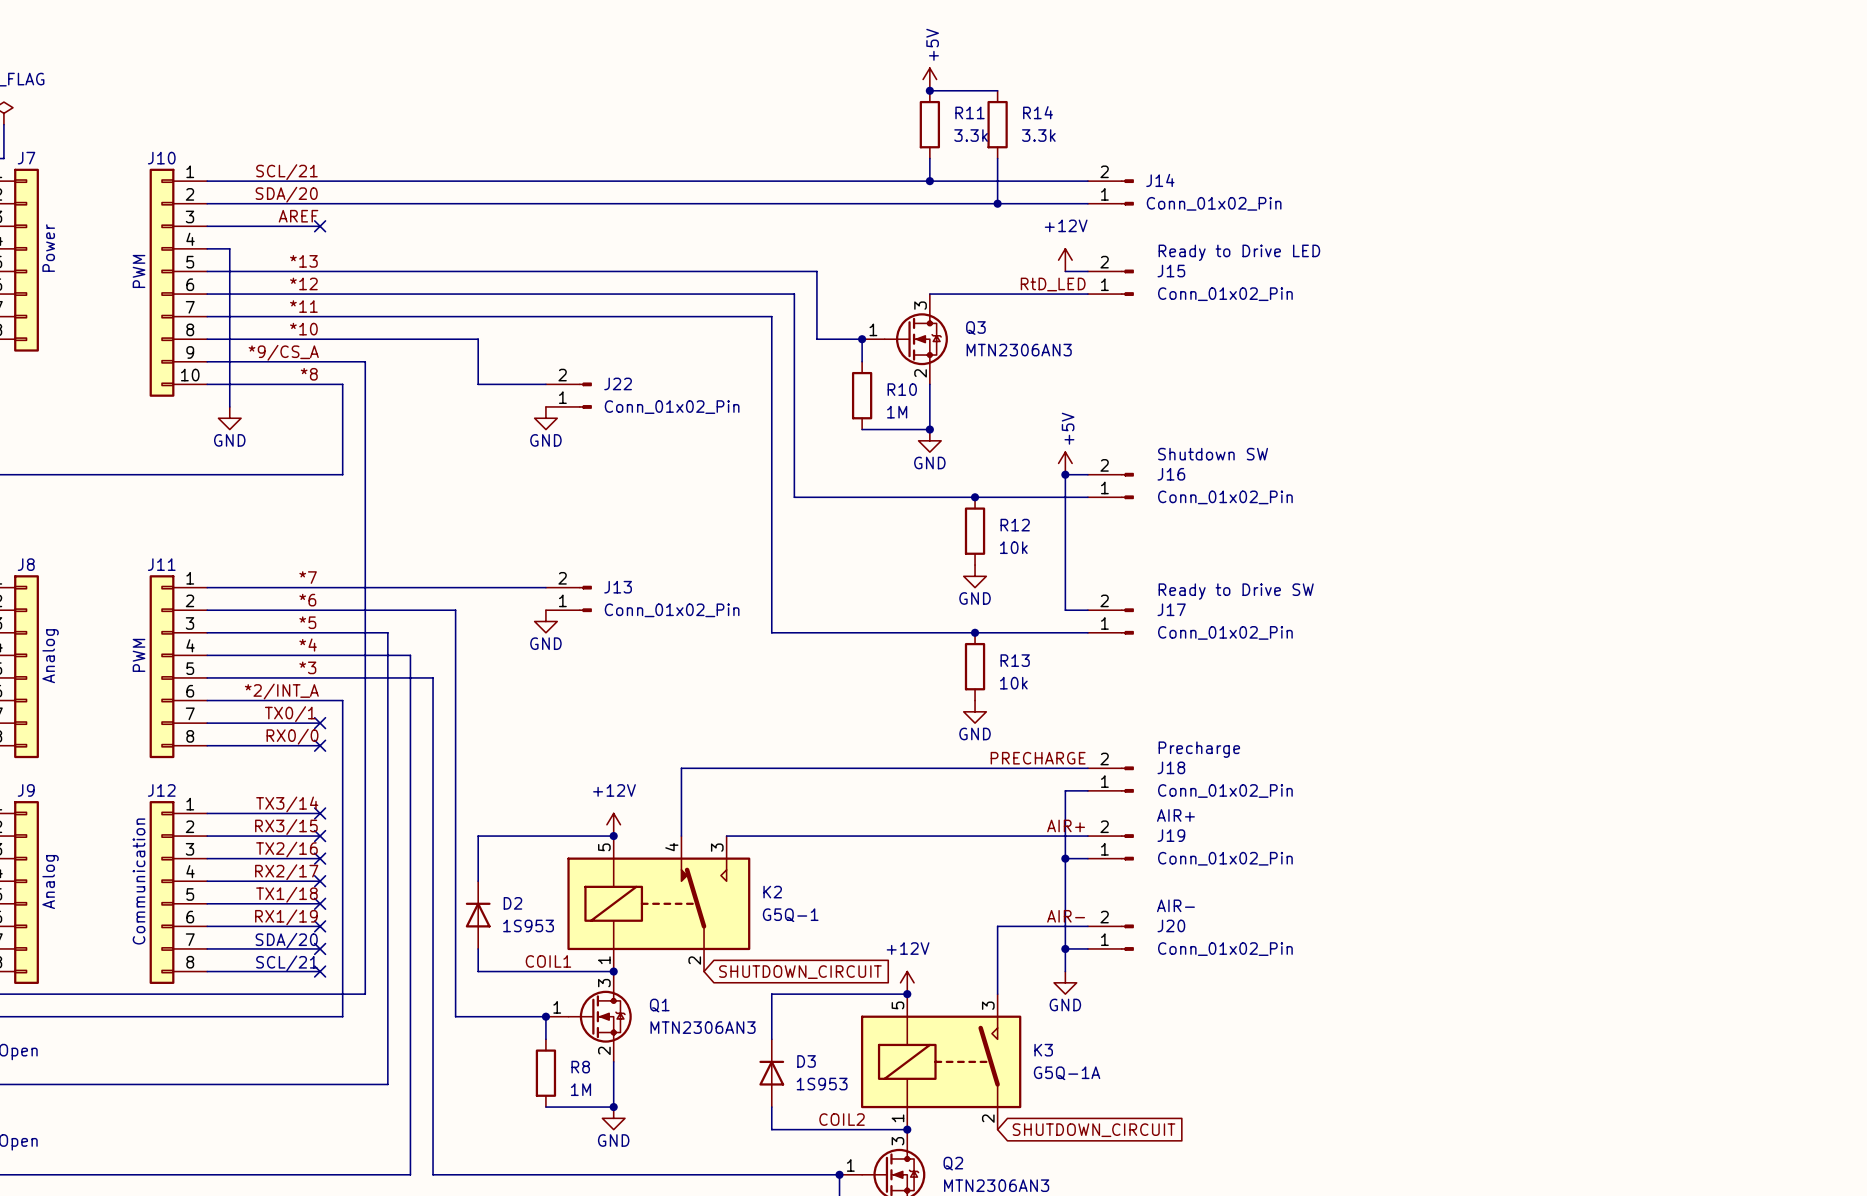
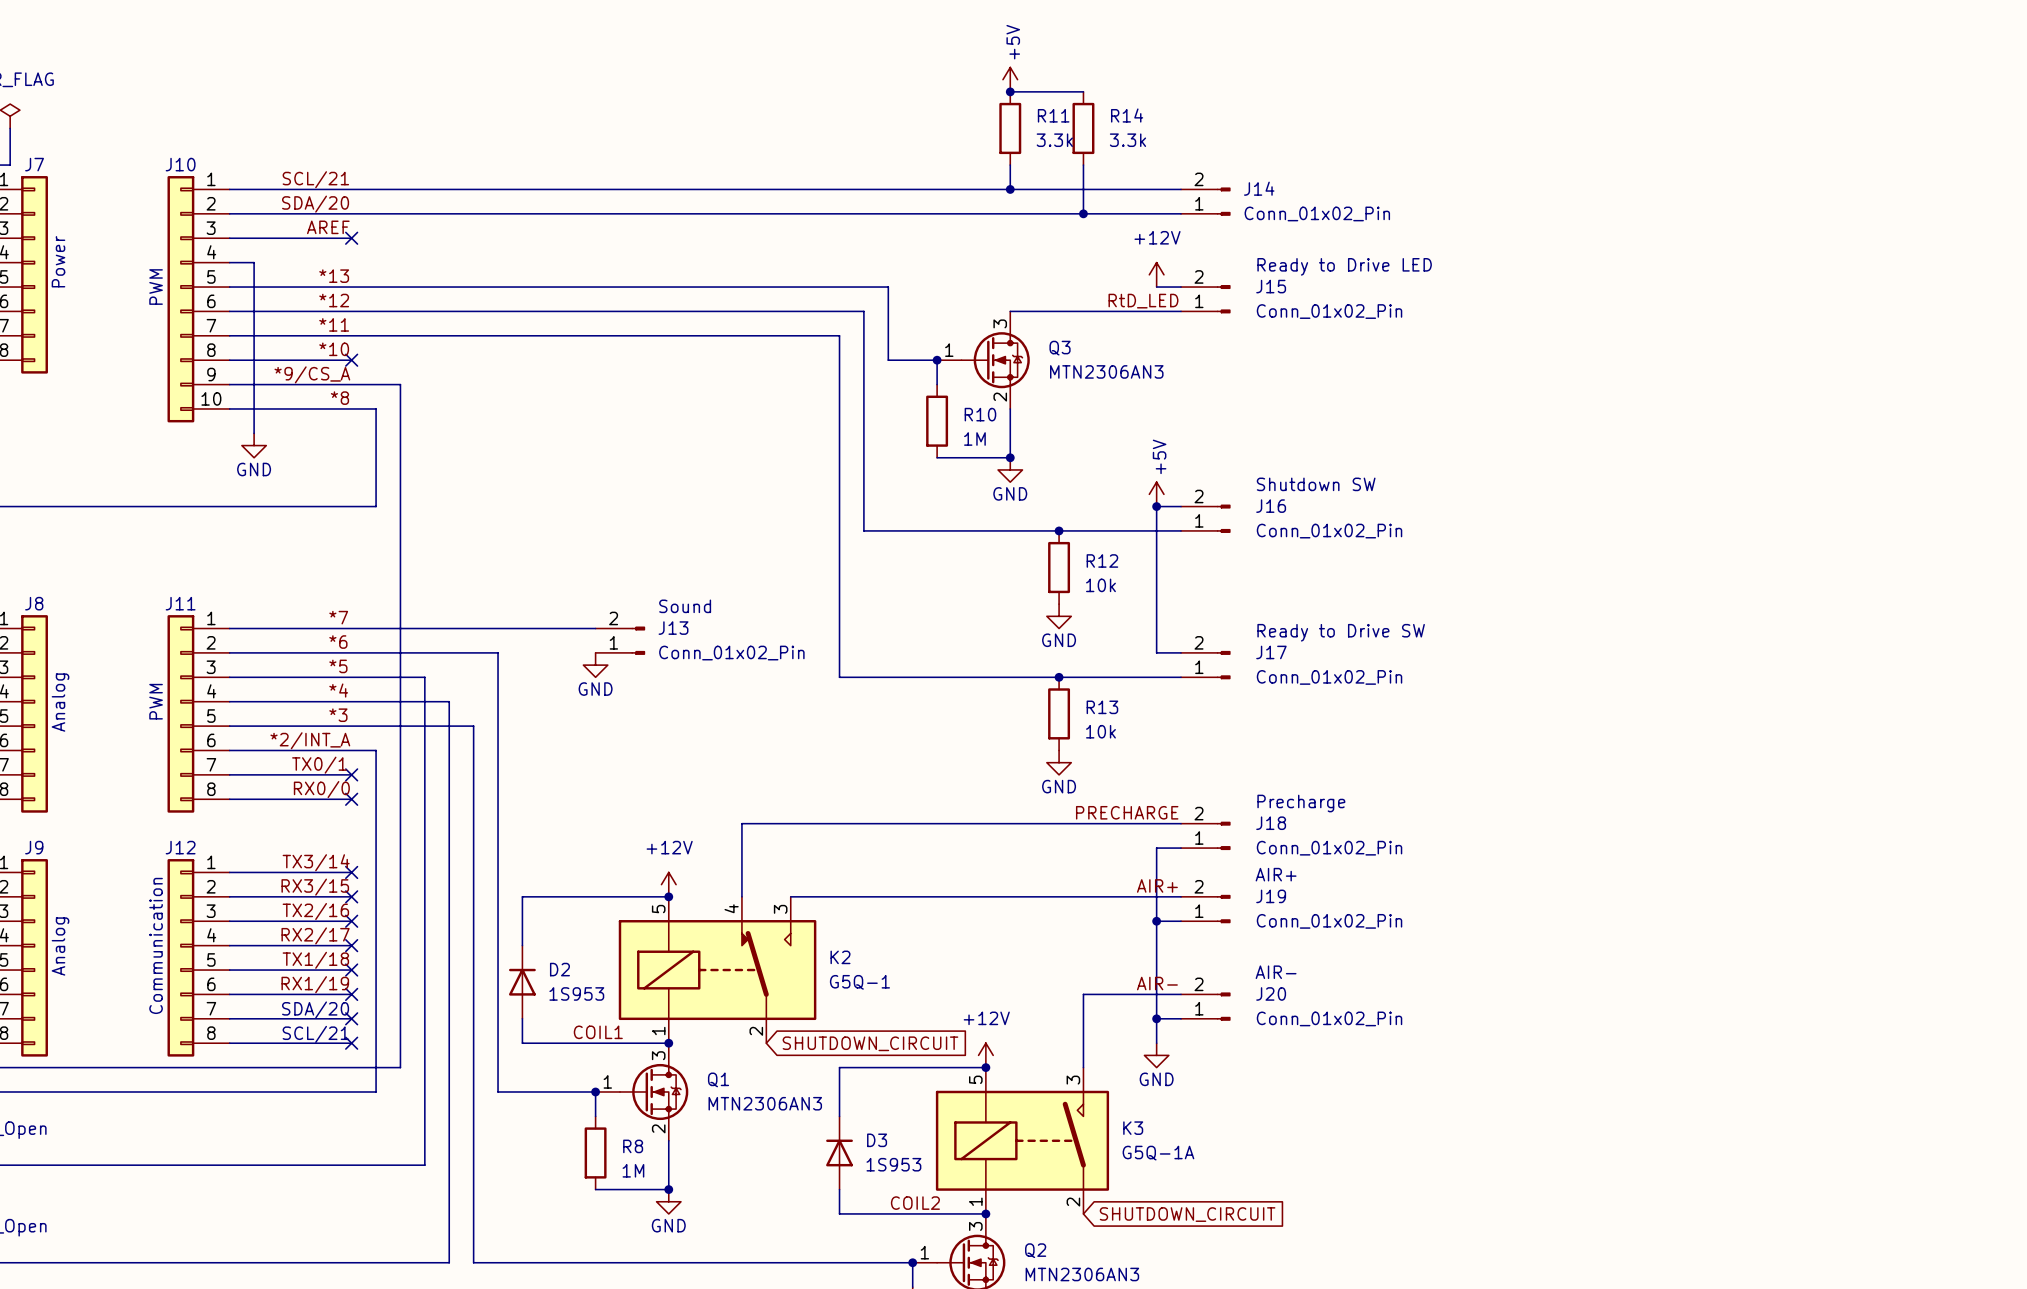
wire: (320, 339) (478, 339) (478, 384) (545, 384) -> none
no-connect mark: none -> (351, 360)
J22: Conn_01x02_Pin (568, 395) -> none
power symbol: GND (545, 418) -> none
text: none -> Sound (685, 606)

